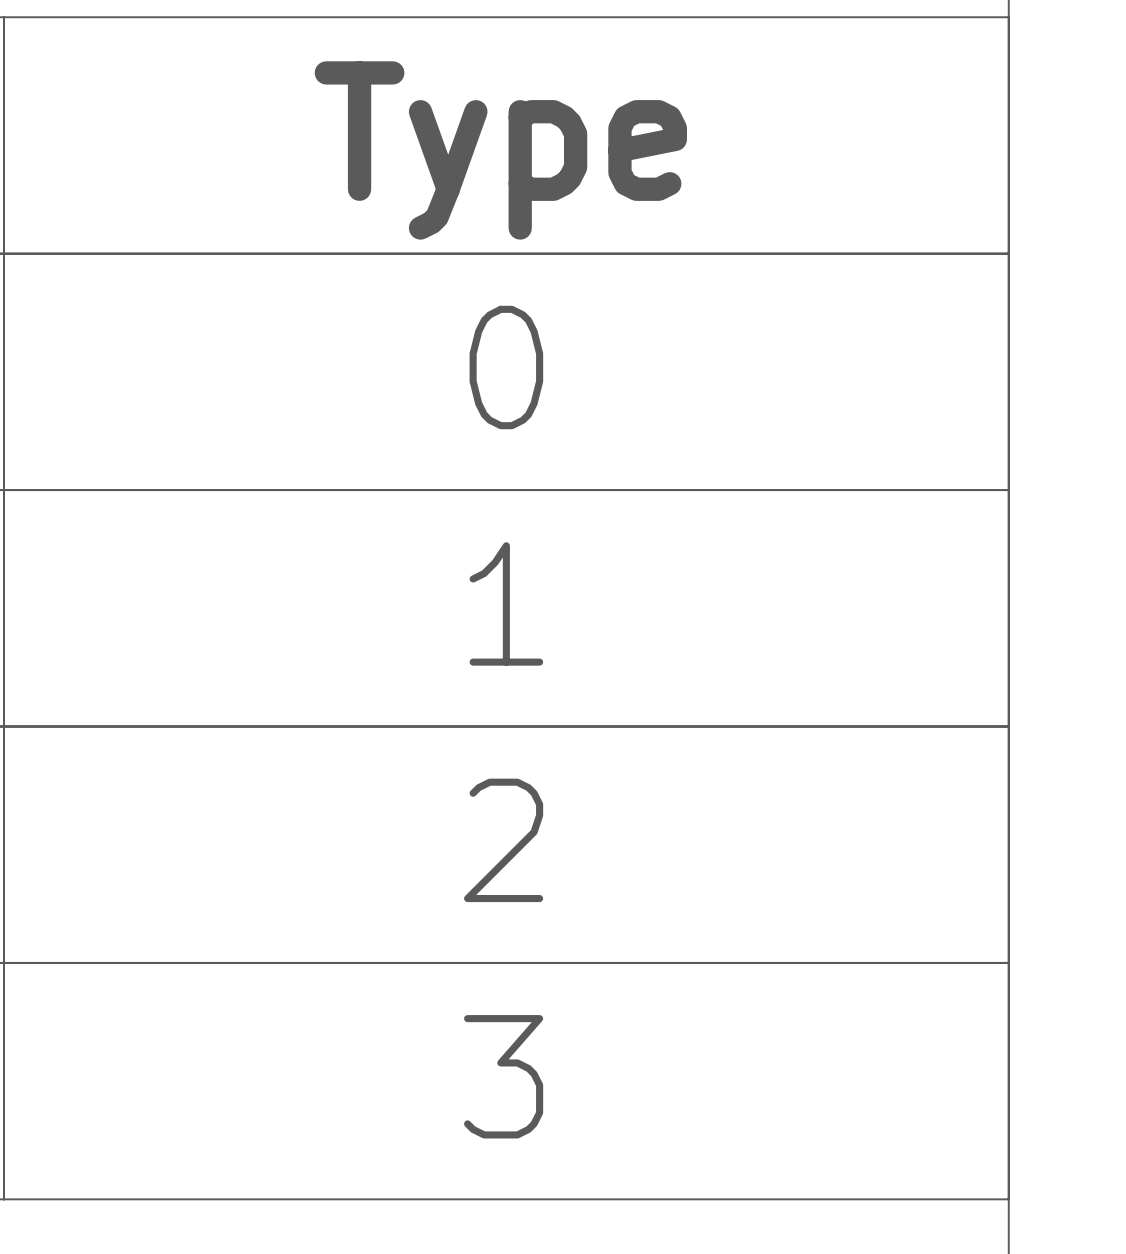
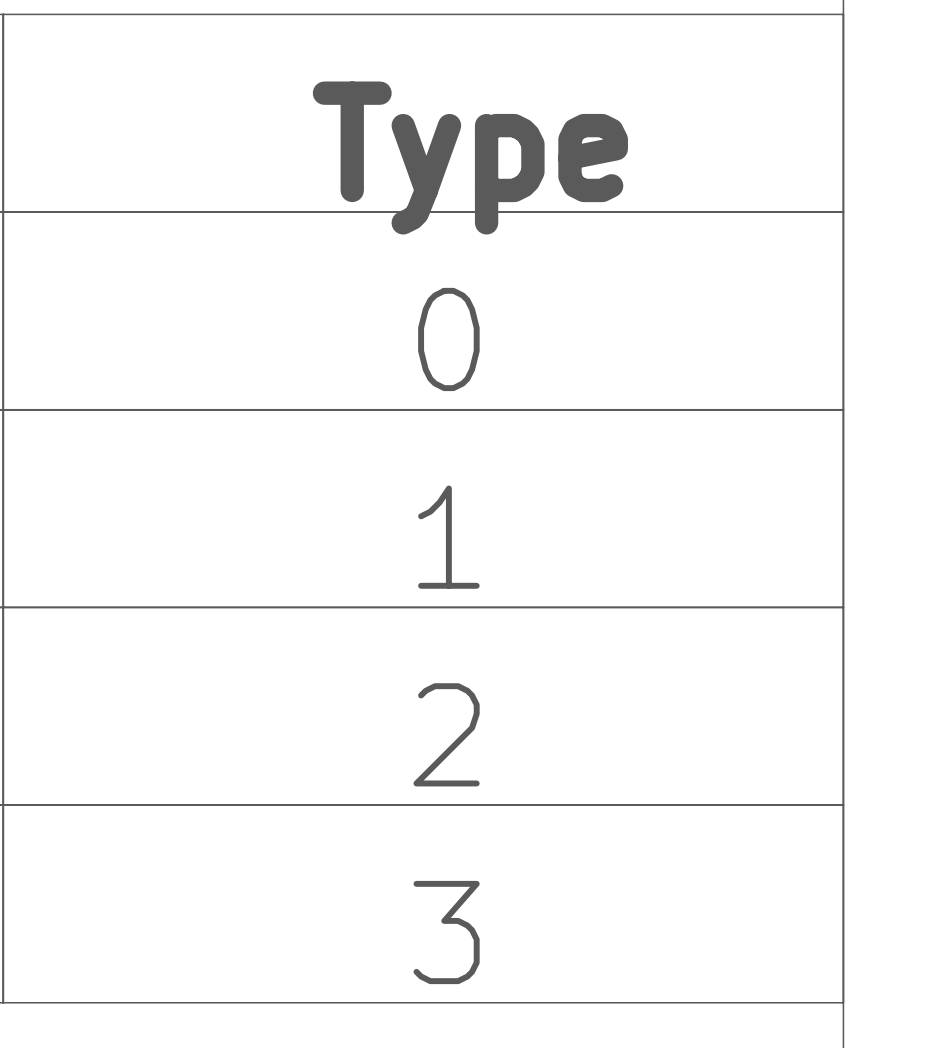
text position: Type (500, 150) -> Type (470, 158)
text position: 0 (506, 367) -> 0 (448, 339)
text position: 1 (506, 603) -> 1 (448, 537)
text position: 2 (503, 840) -> 2 (446, 734)
text position: 3 (503, 1076) -> 3 (446, 932)

